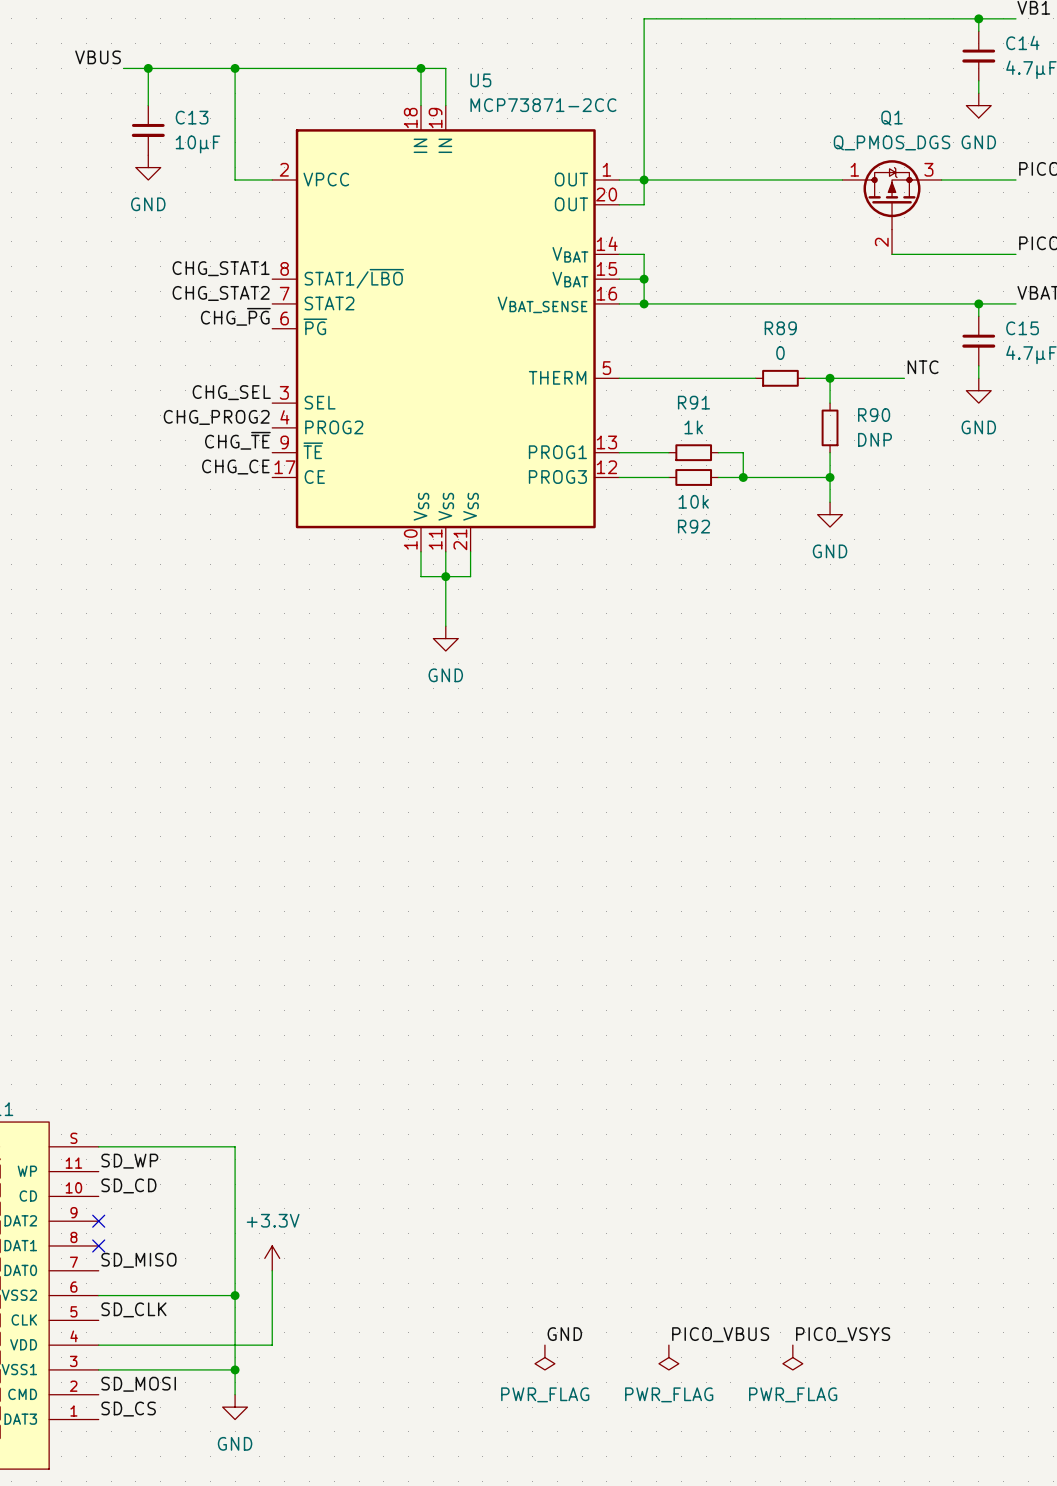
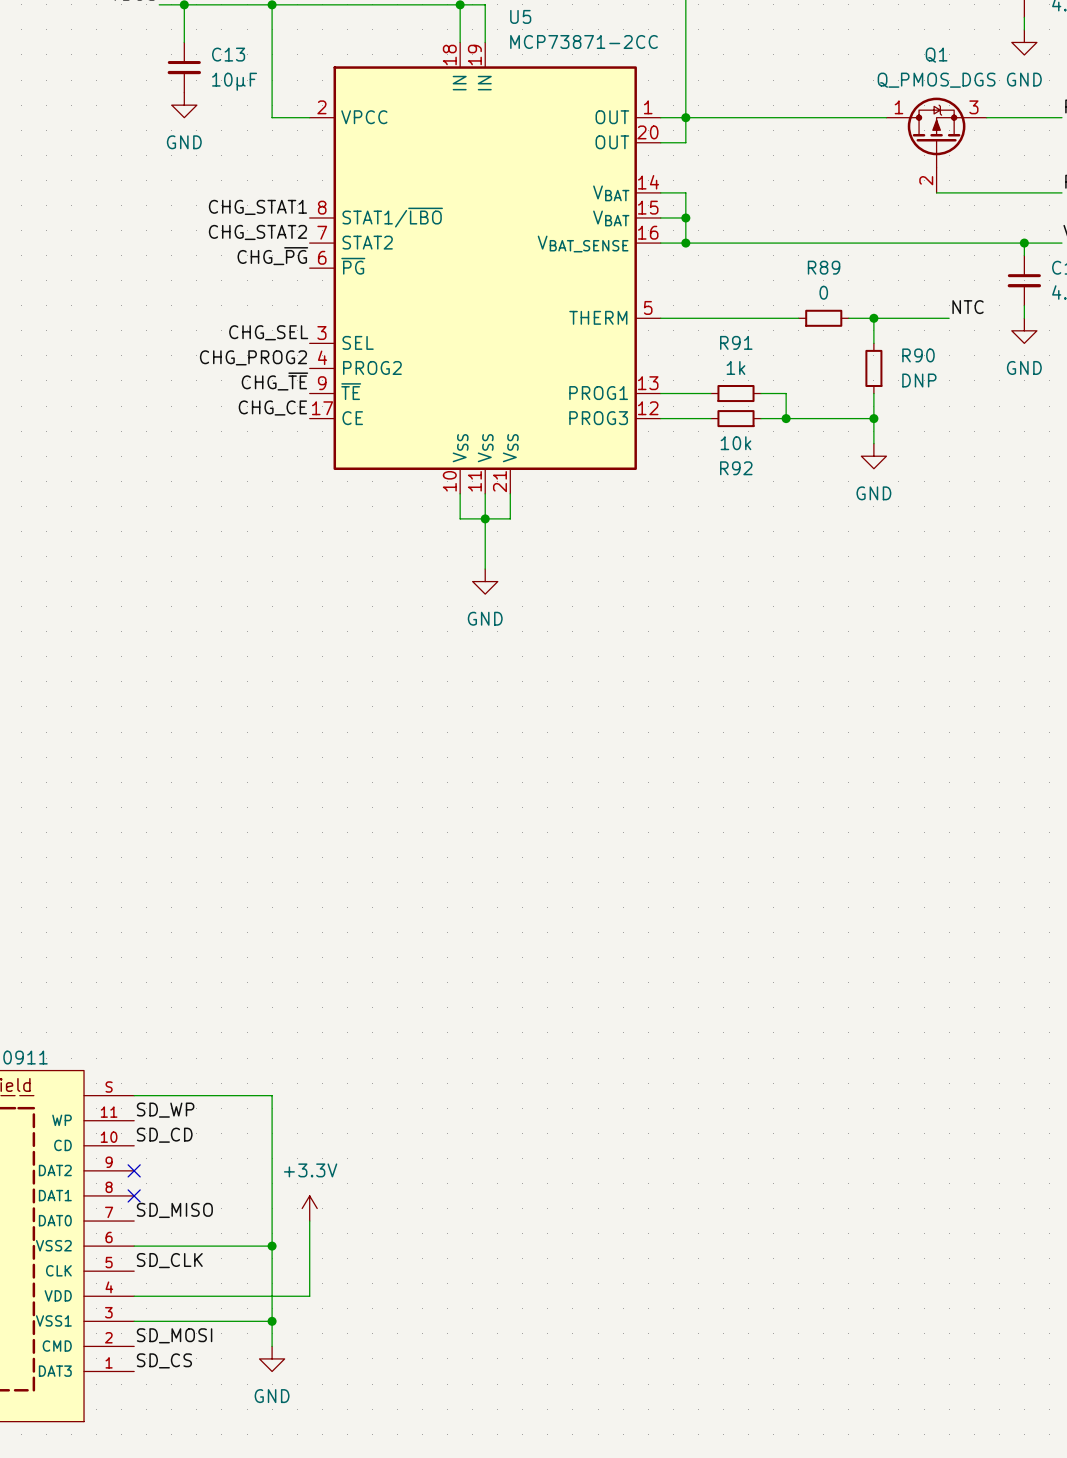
label: GND (564, 1334) -> none
label: PICO_VBUS (720, 1334) -> none
label: PICO_VSYS (843, 1334) -> none
power symbol: PWR_FLAG (544, 1357) -> none
power symbol: PWR_FLAG (668, 1357) -> none
power symbol: PWR_FLAG (792, 1357) -> none

